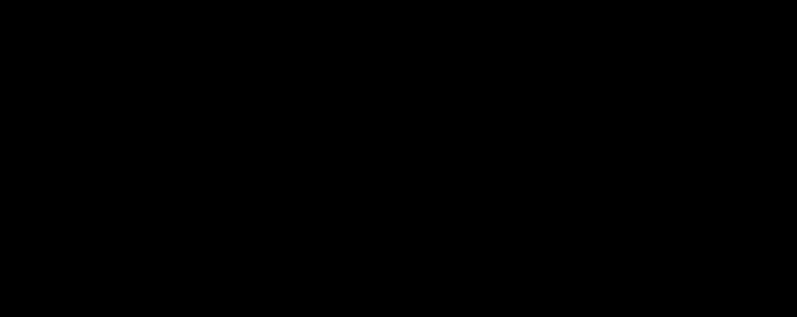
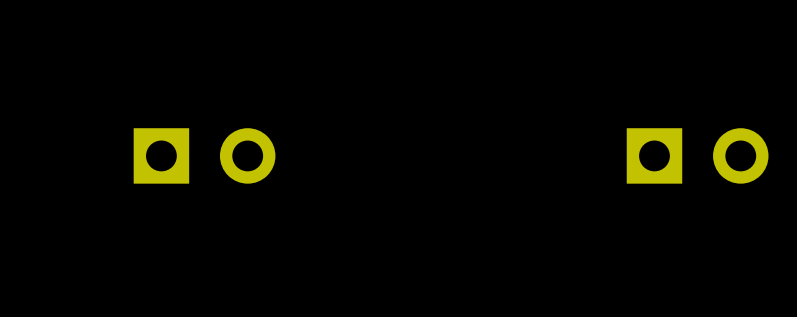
part: none -> (204, 155)
part: none -> (697, 155)

